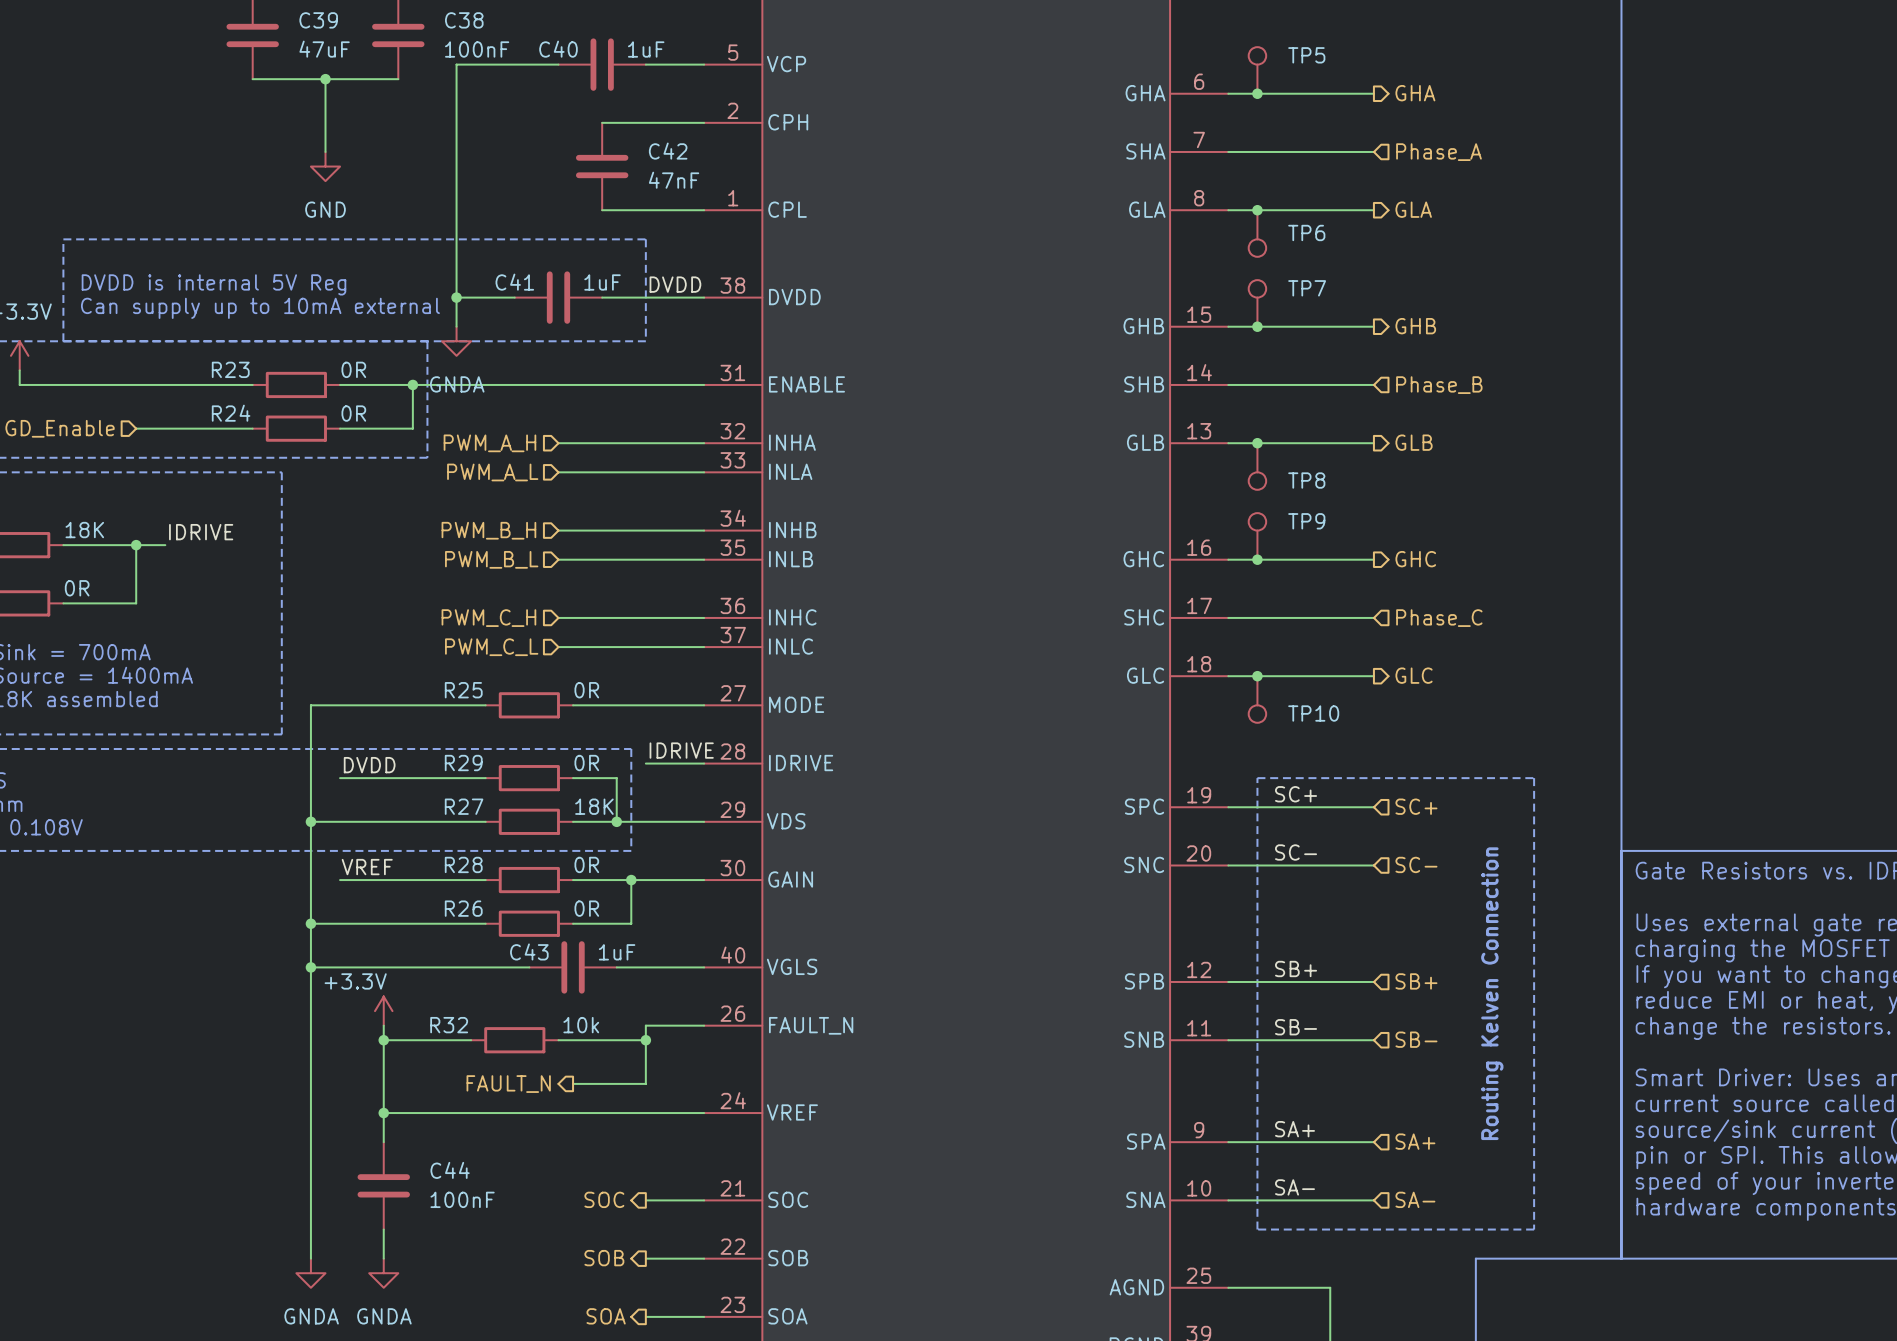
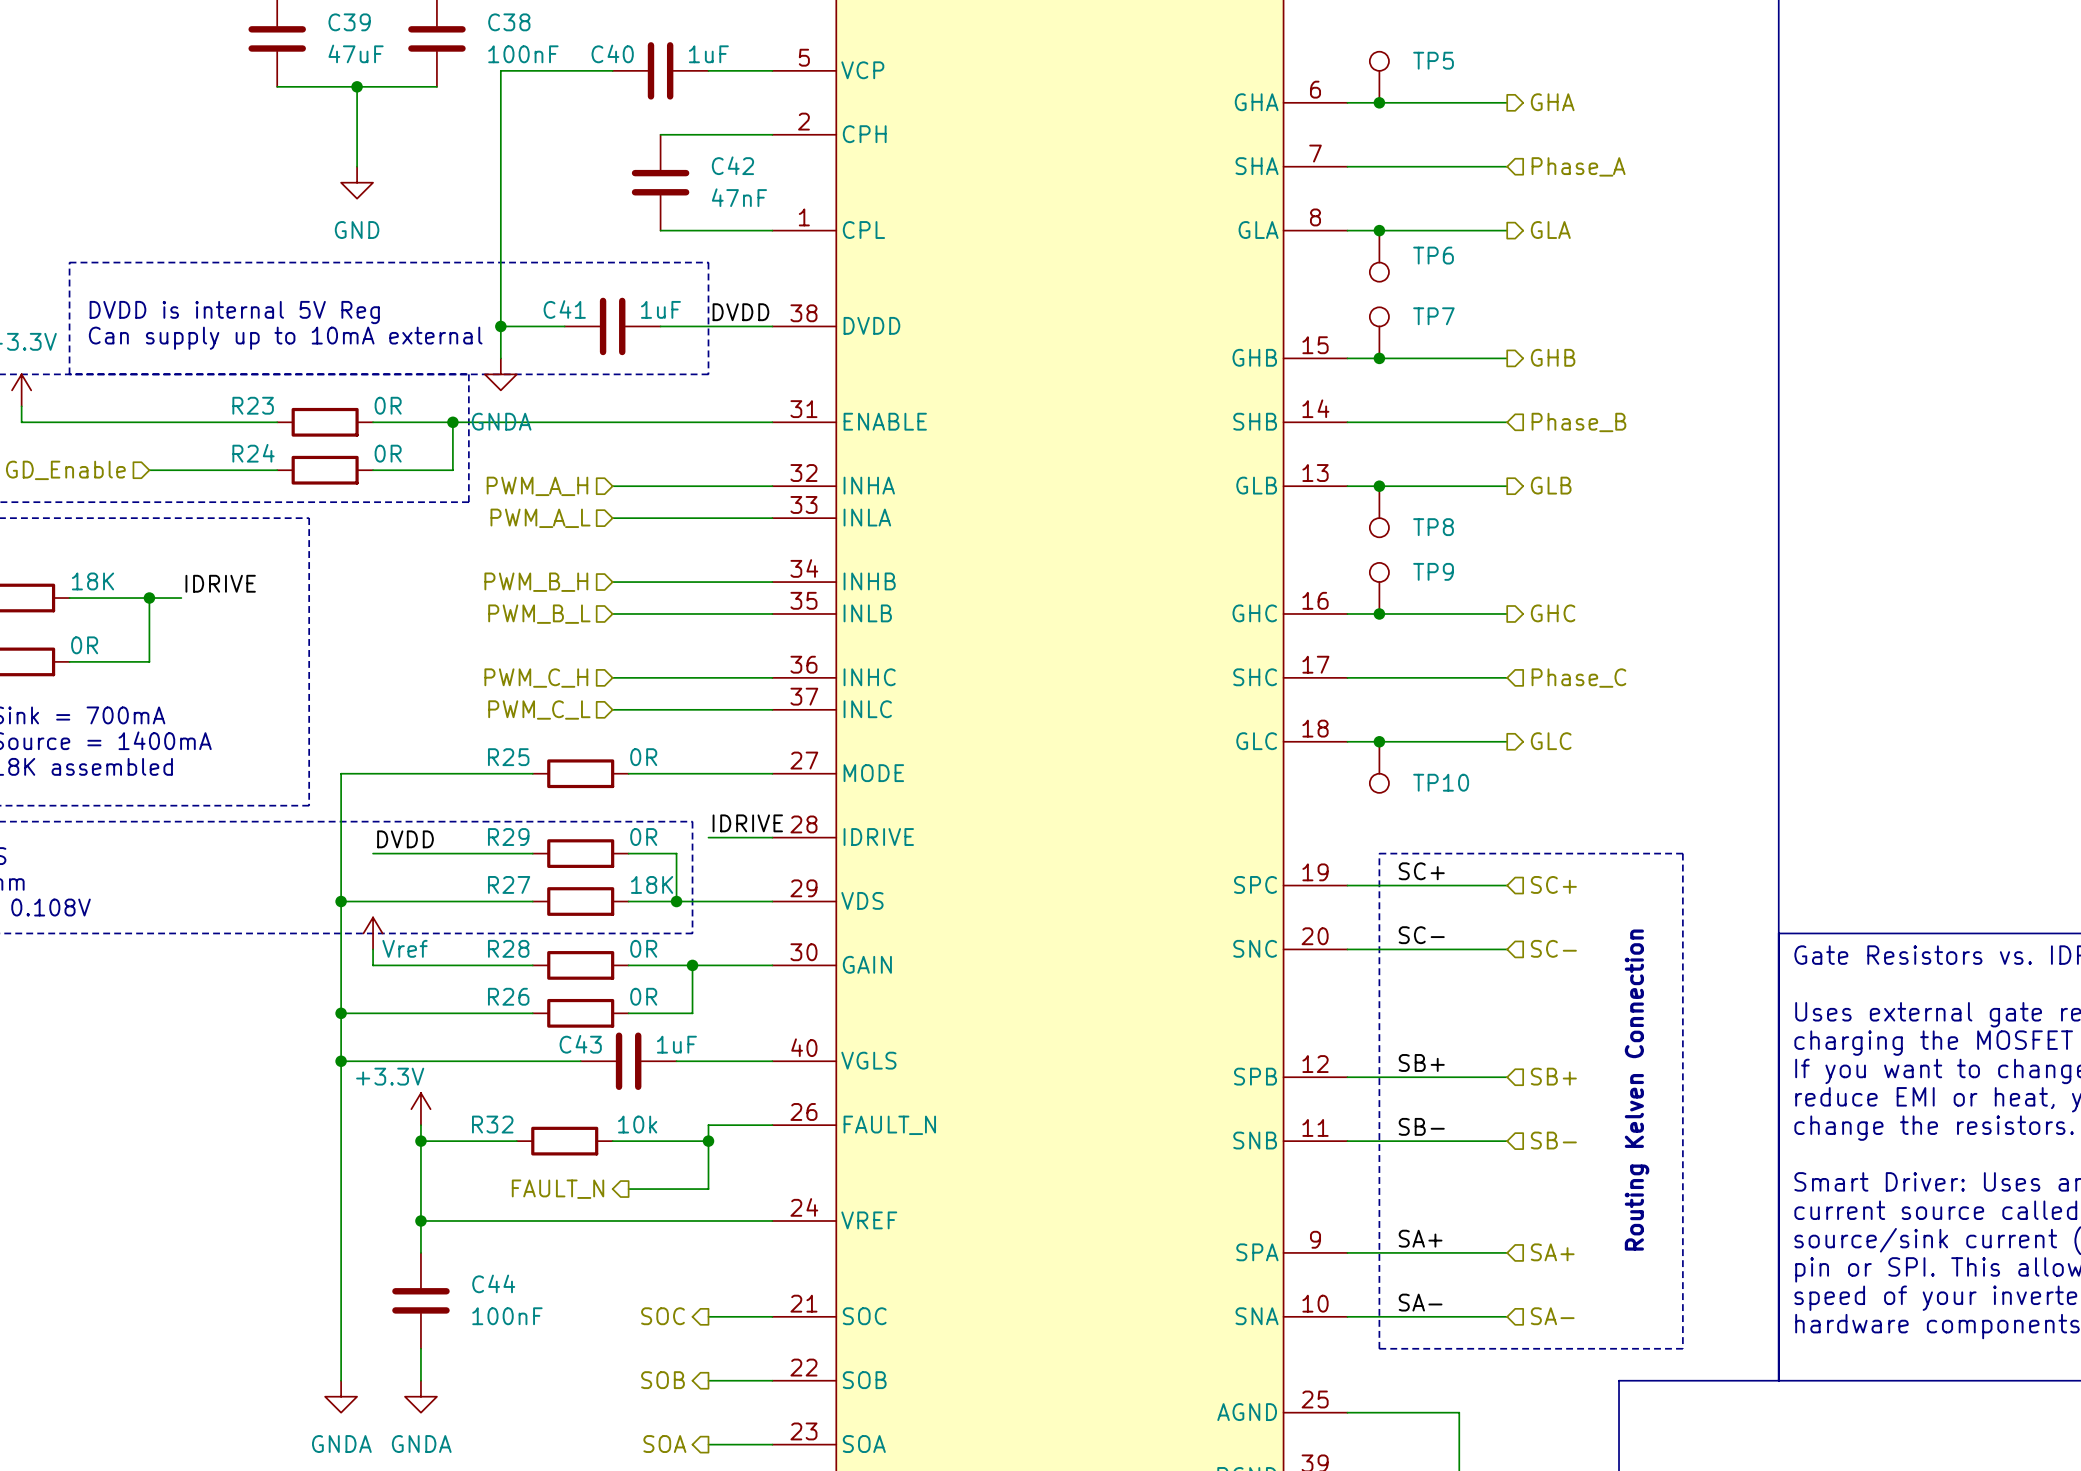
power symbol: none -> Vref (373, 933)
wire: none -> (373, 949) (373, 965)
label: VREF (367, 867) -> none

